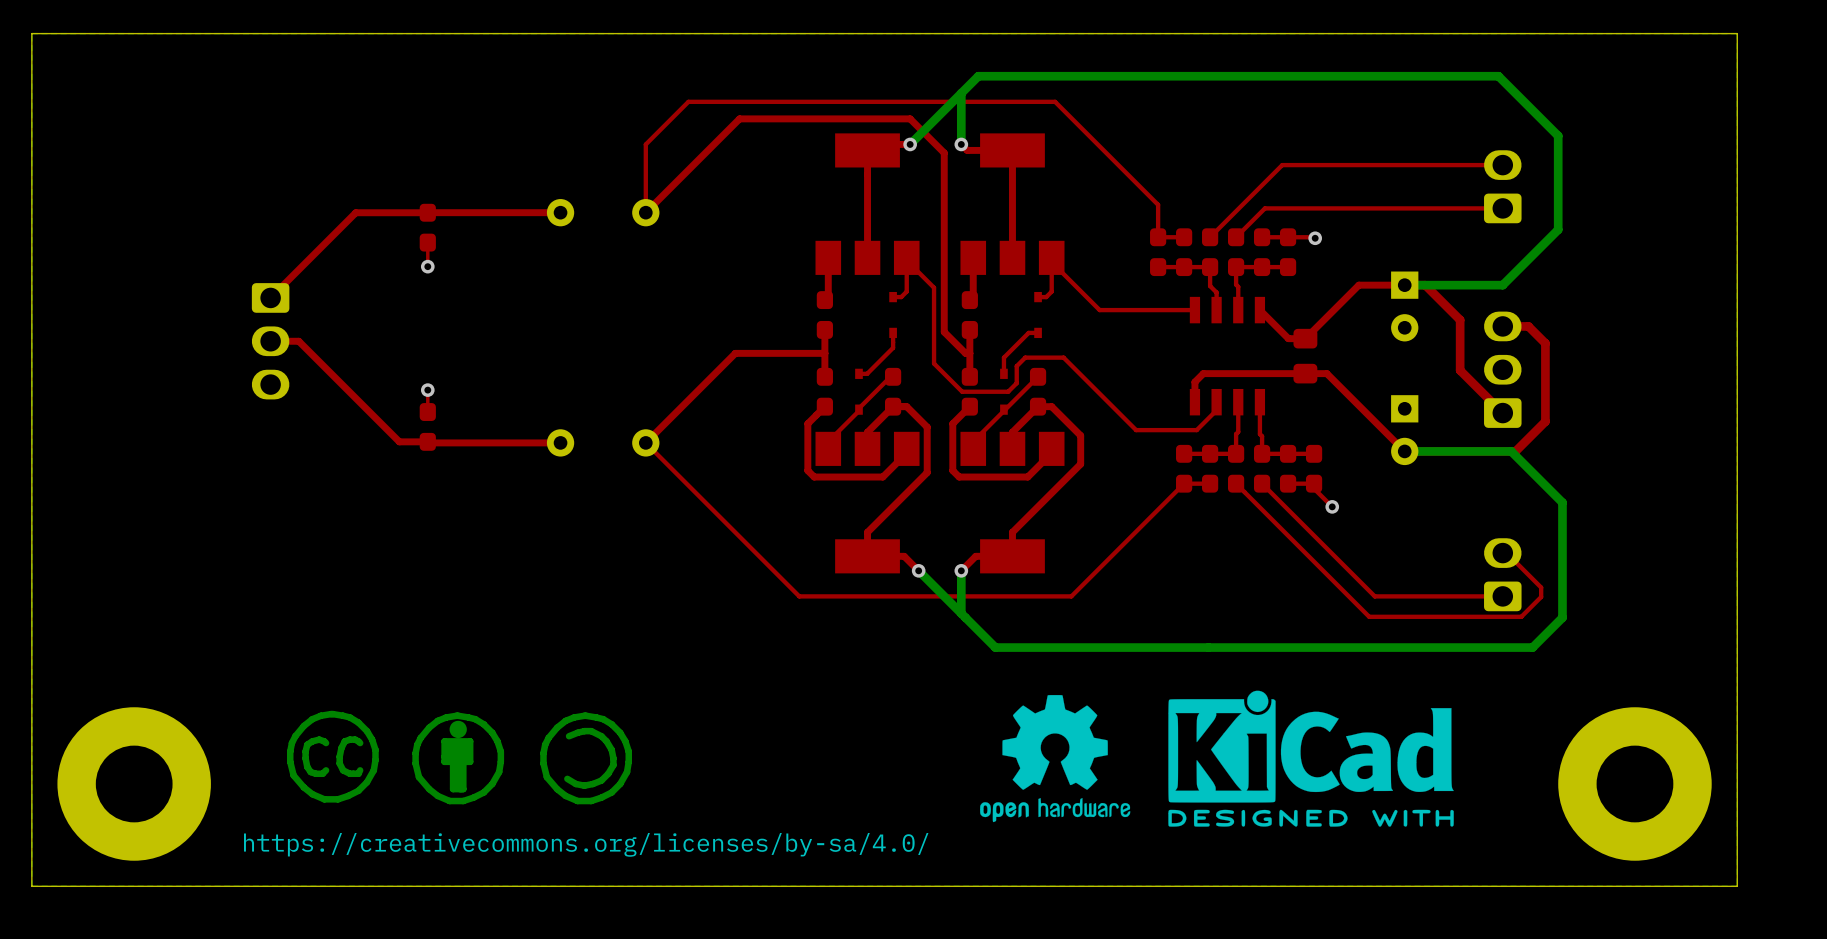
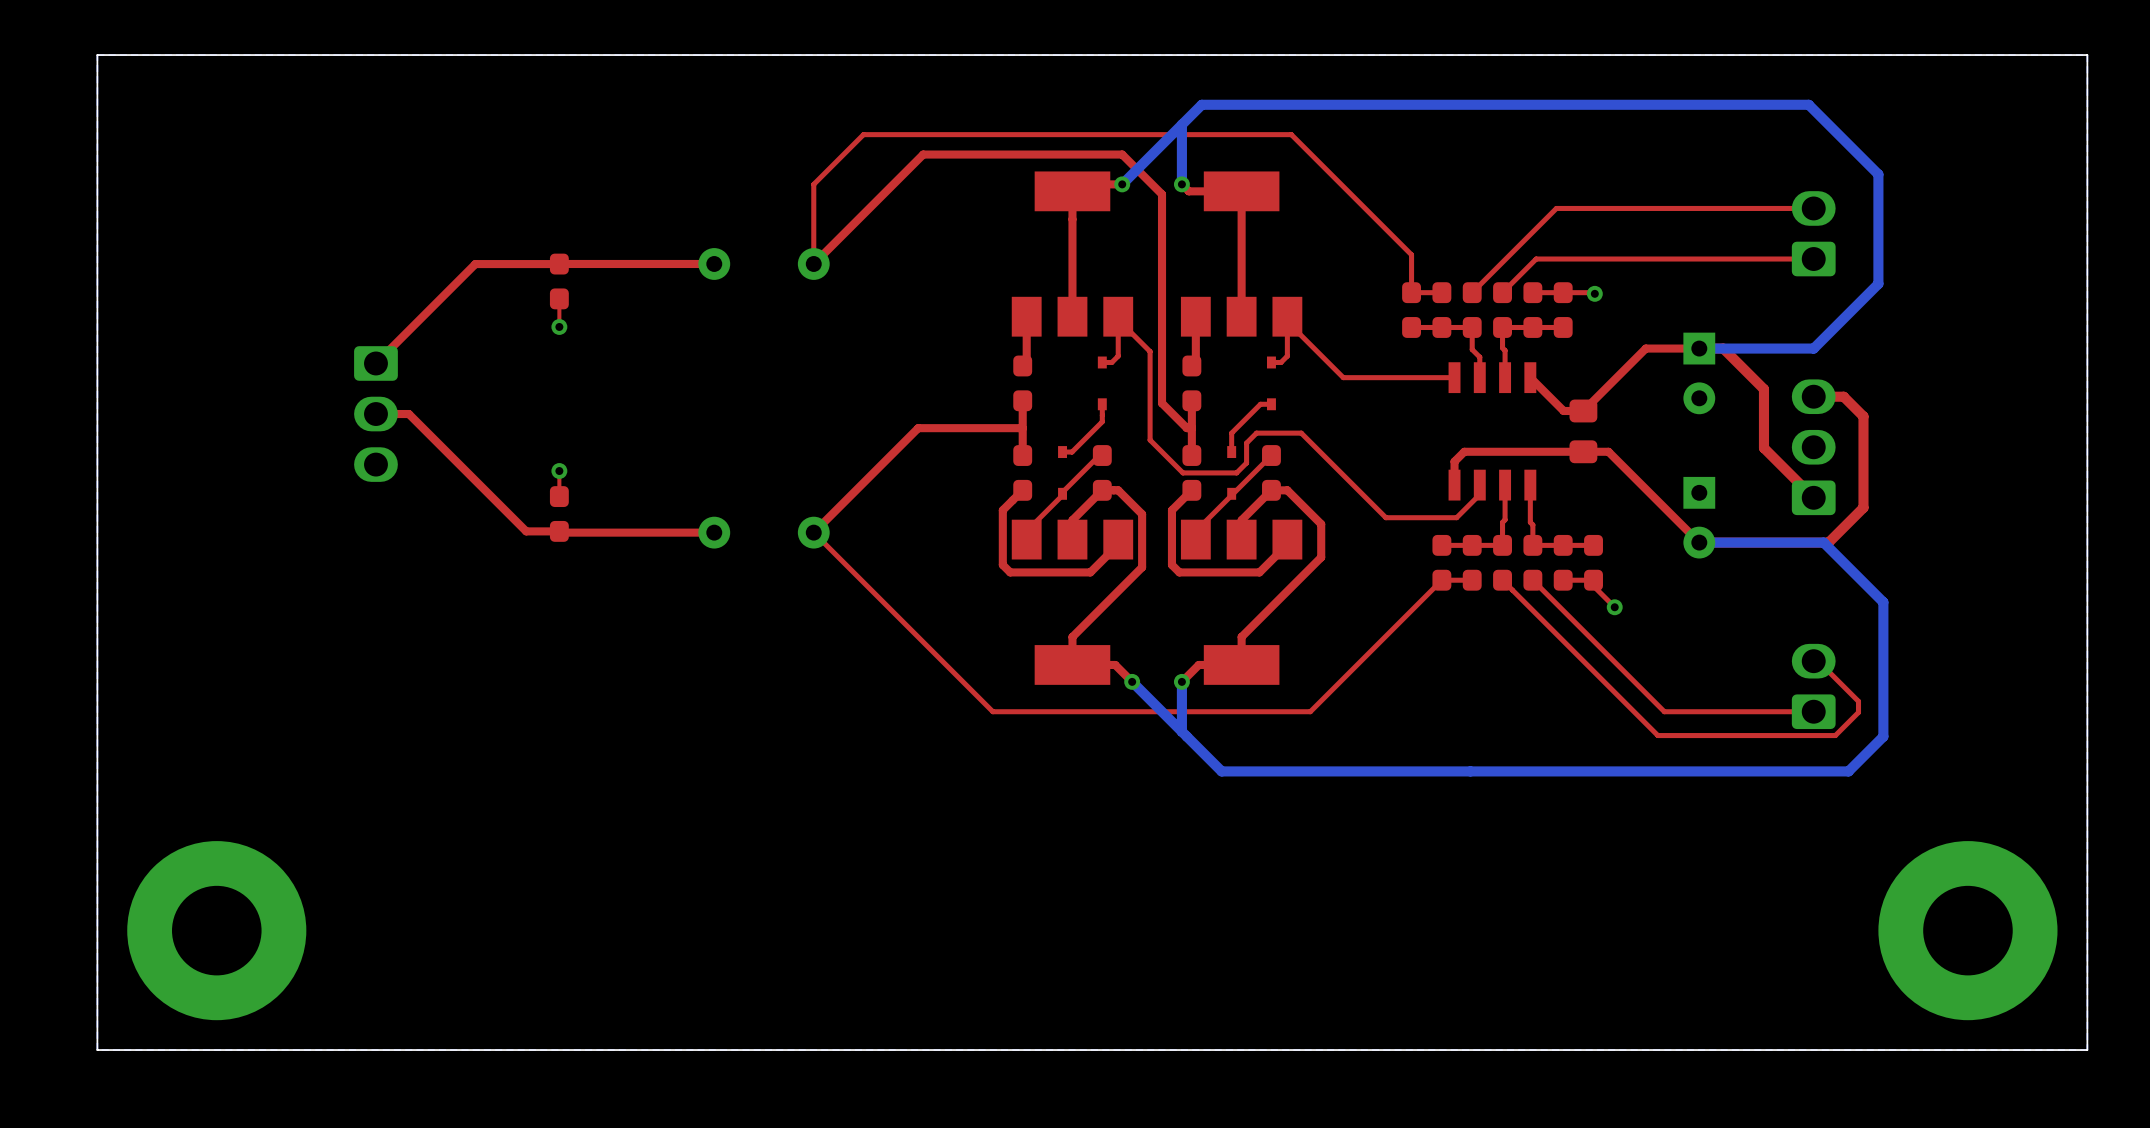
drawing: [1168, 690, 1454, 827] -> none
drawing: [980, 695, 1131, 823] -> none
drawing: [286, 710, 379, 803] -> none
drawing: [412, 712, 505, 805] -> none
drawing: [540, 712, 633, 805] -> none
text: https://creativecommons.org/licenses/by-sa/4.0/ (586, 844) -> none

